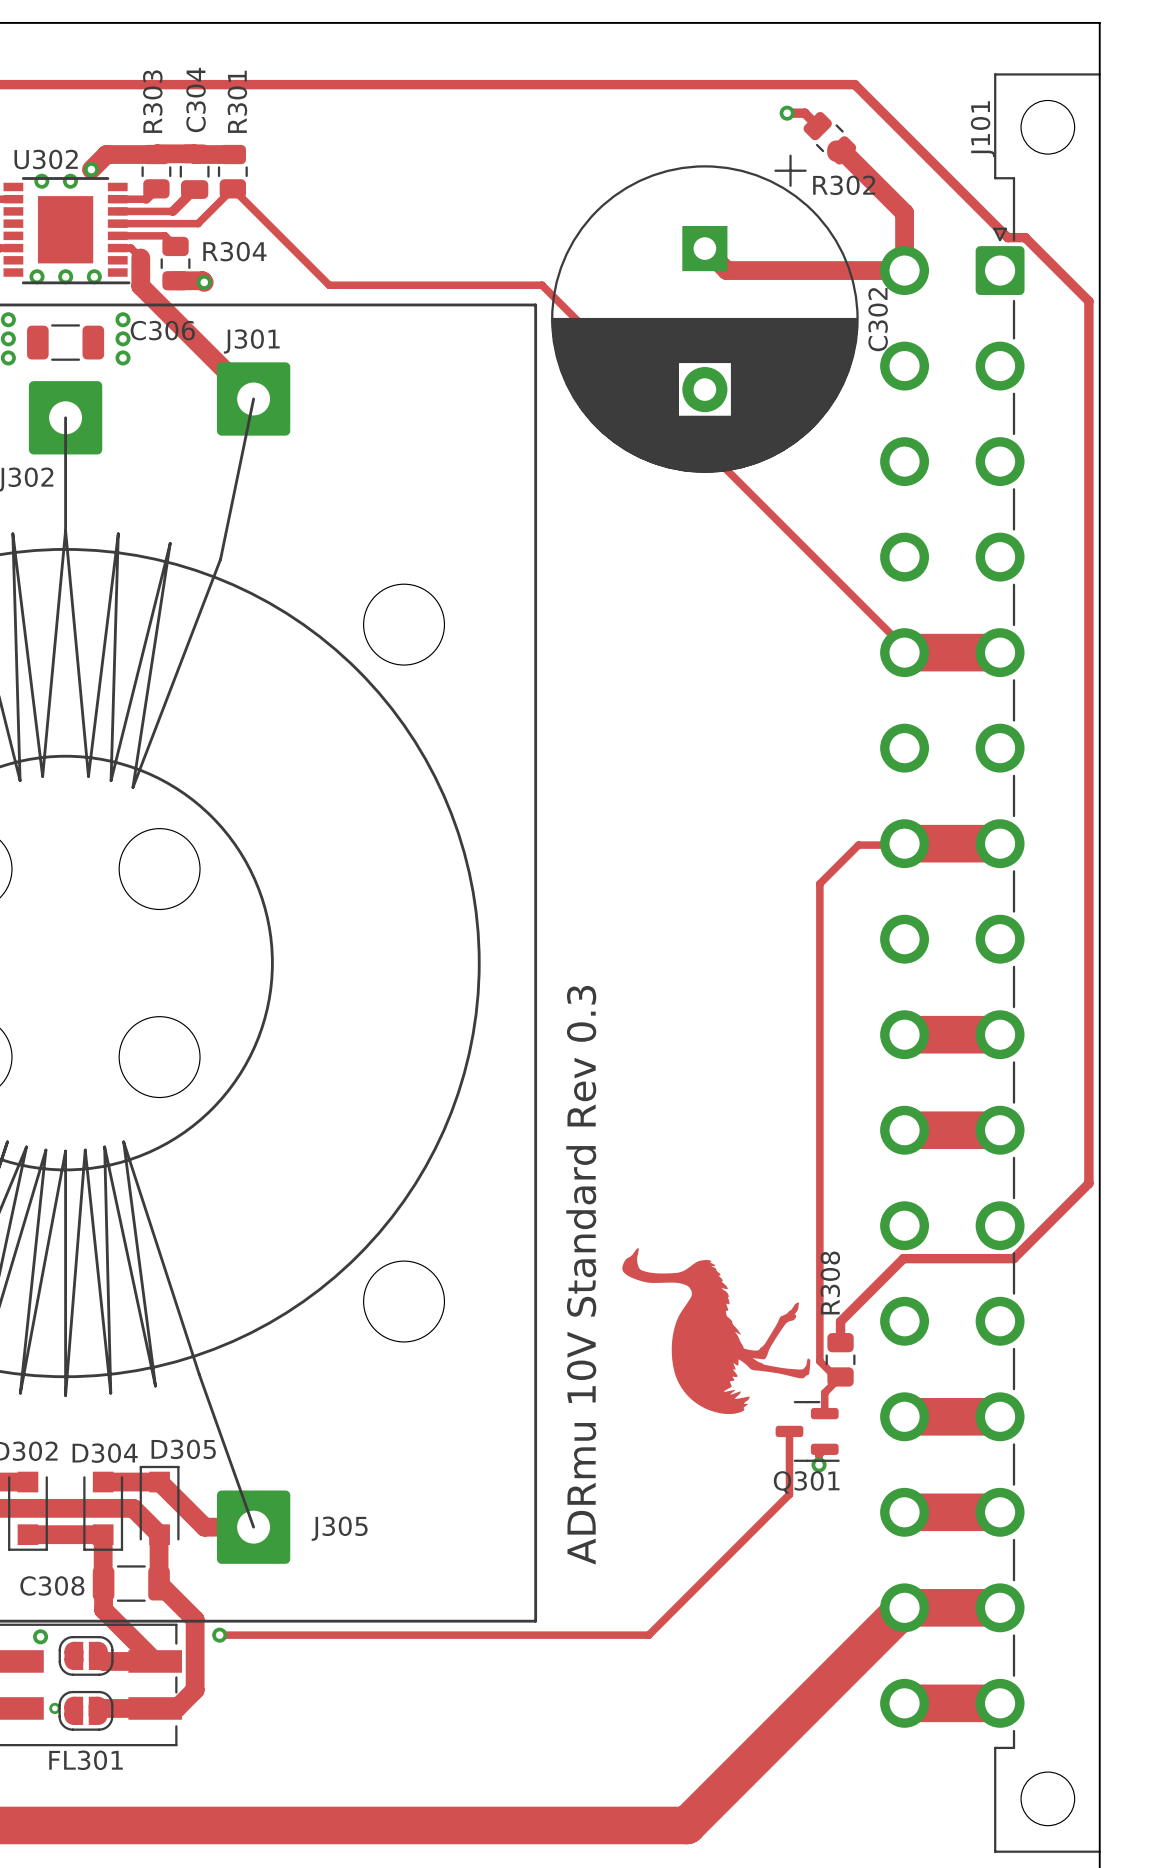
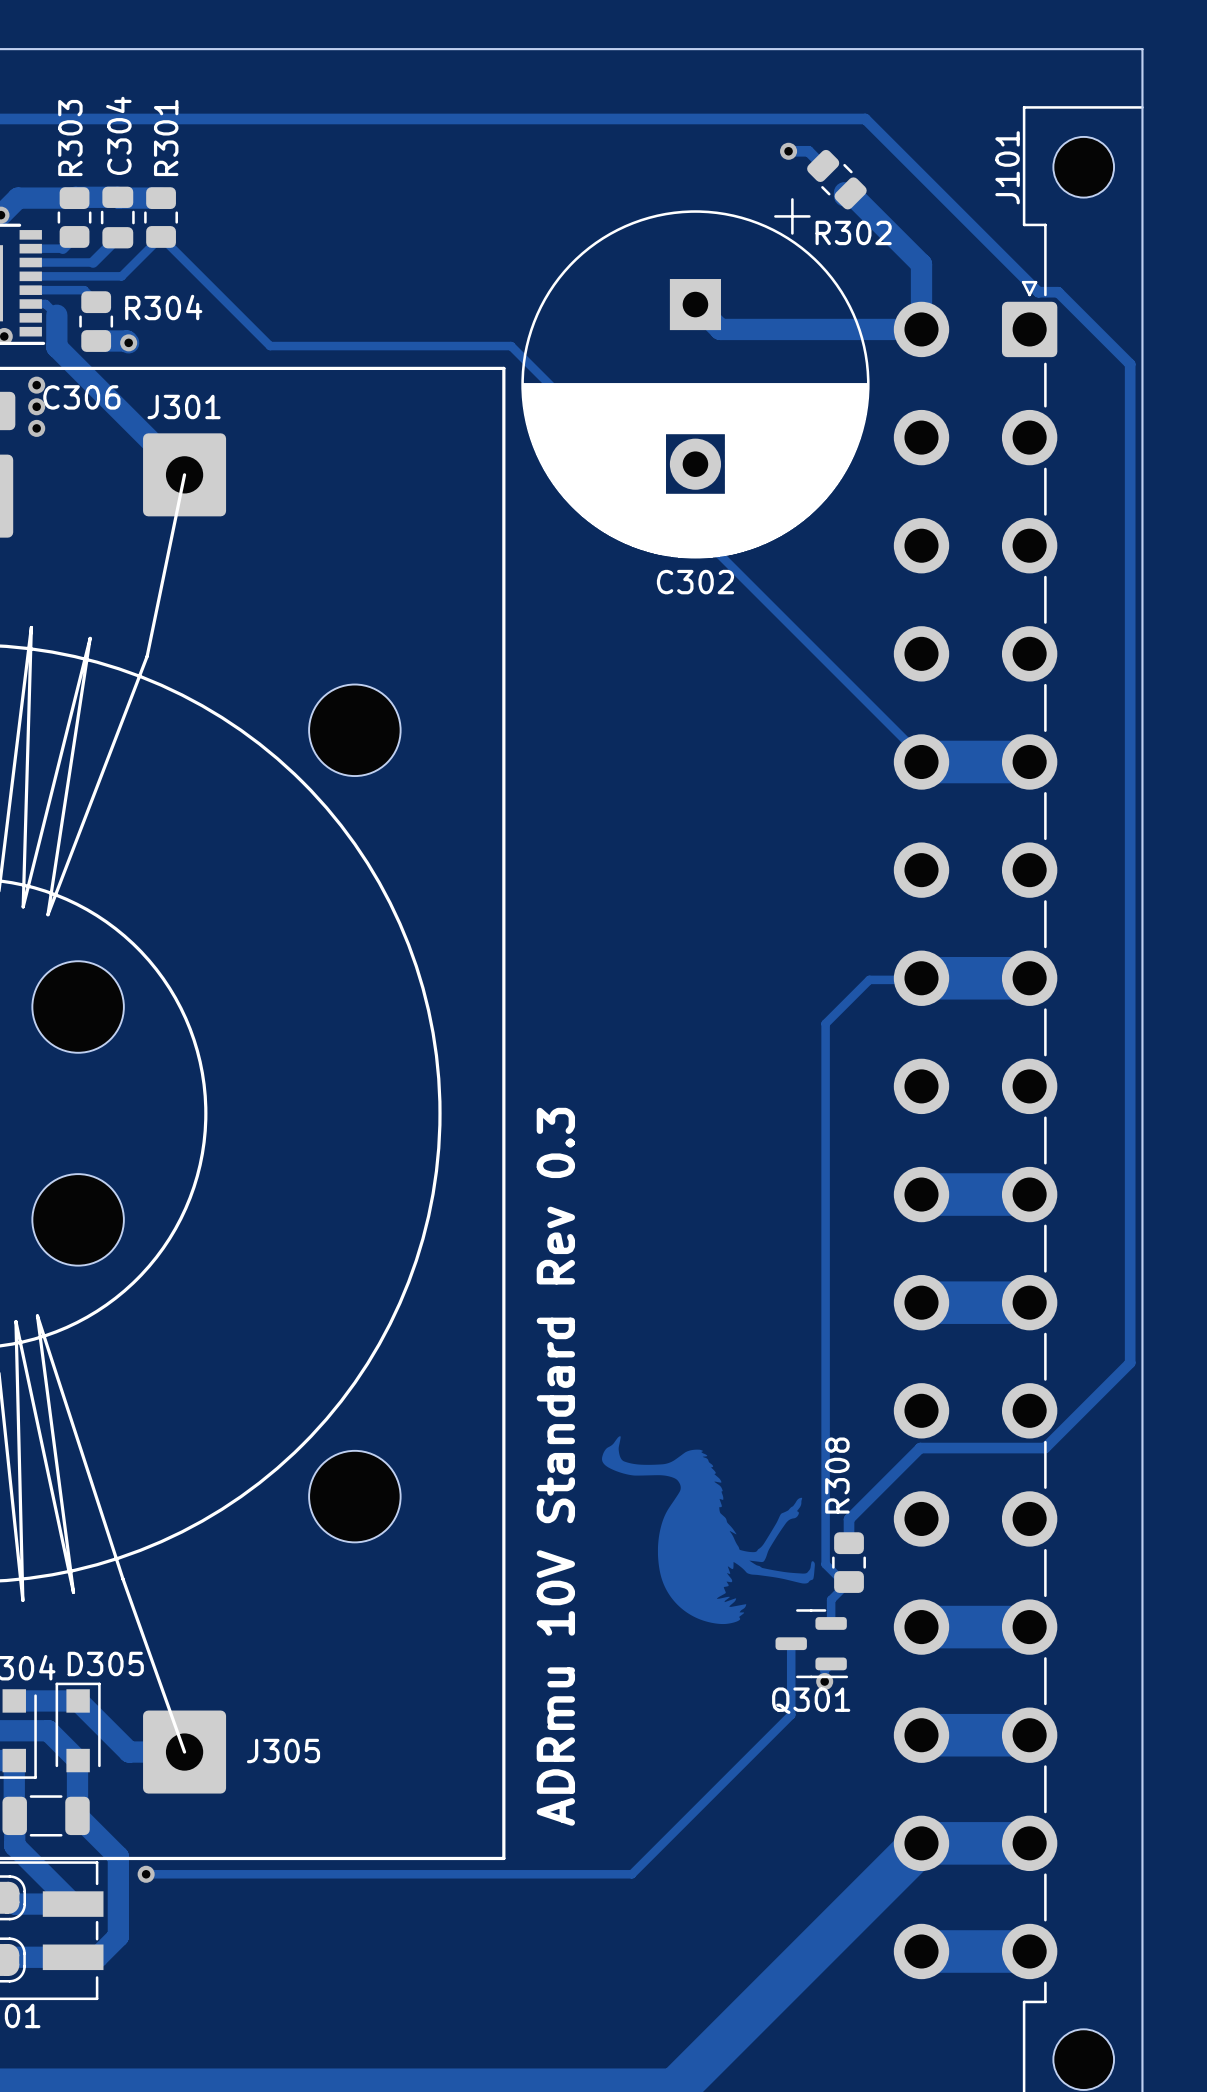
C302 name rotation: 0° (878, 319) -> 90° clockwise (695, 582)
C302 name position: C302 (878, 319) -> C302 (695, 582)

